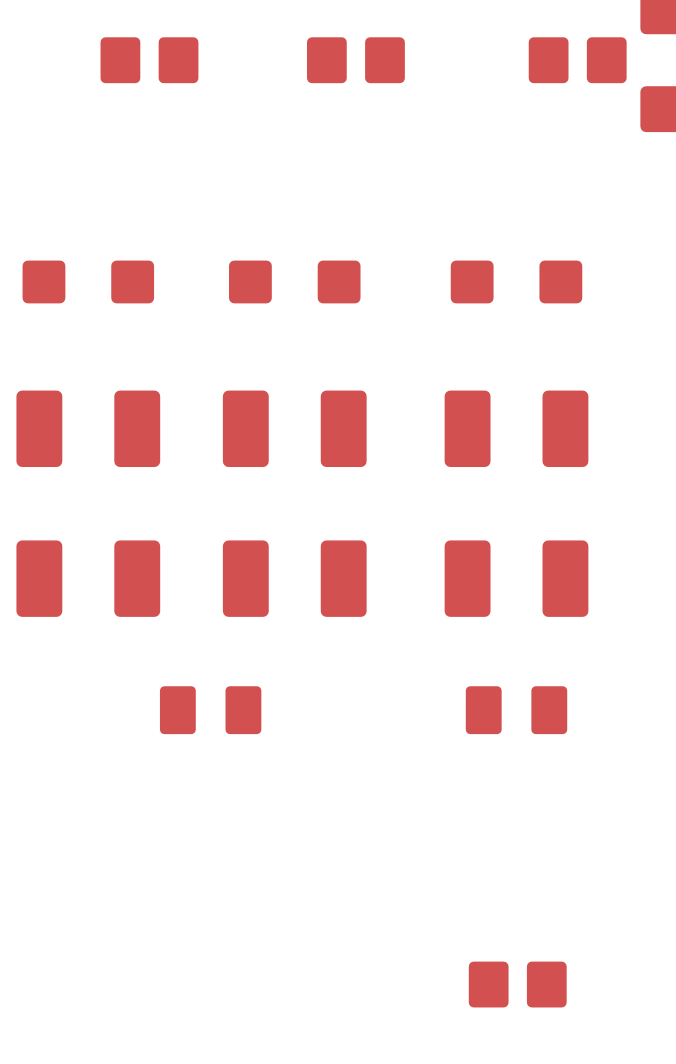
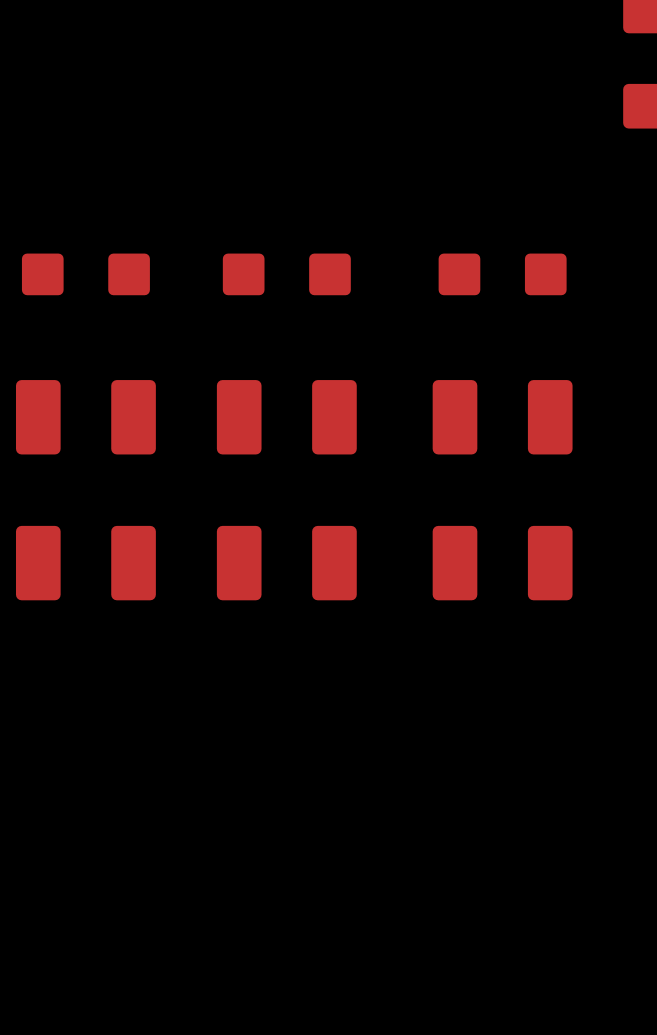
part: (149, 60) -> none
part: (355, 60) -> none
part: (577, 60) -> none
part: (210, 710) -> none
part: (516, 710) -> none
part: (517, 984) -> none

